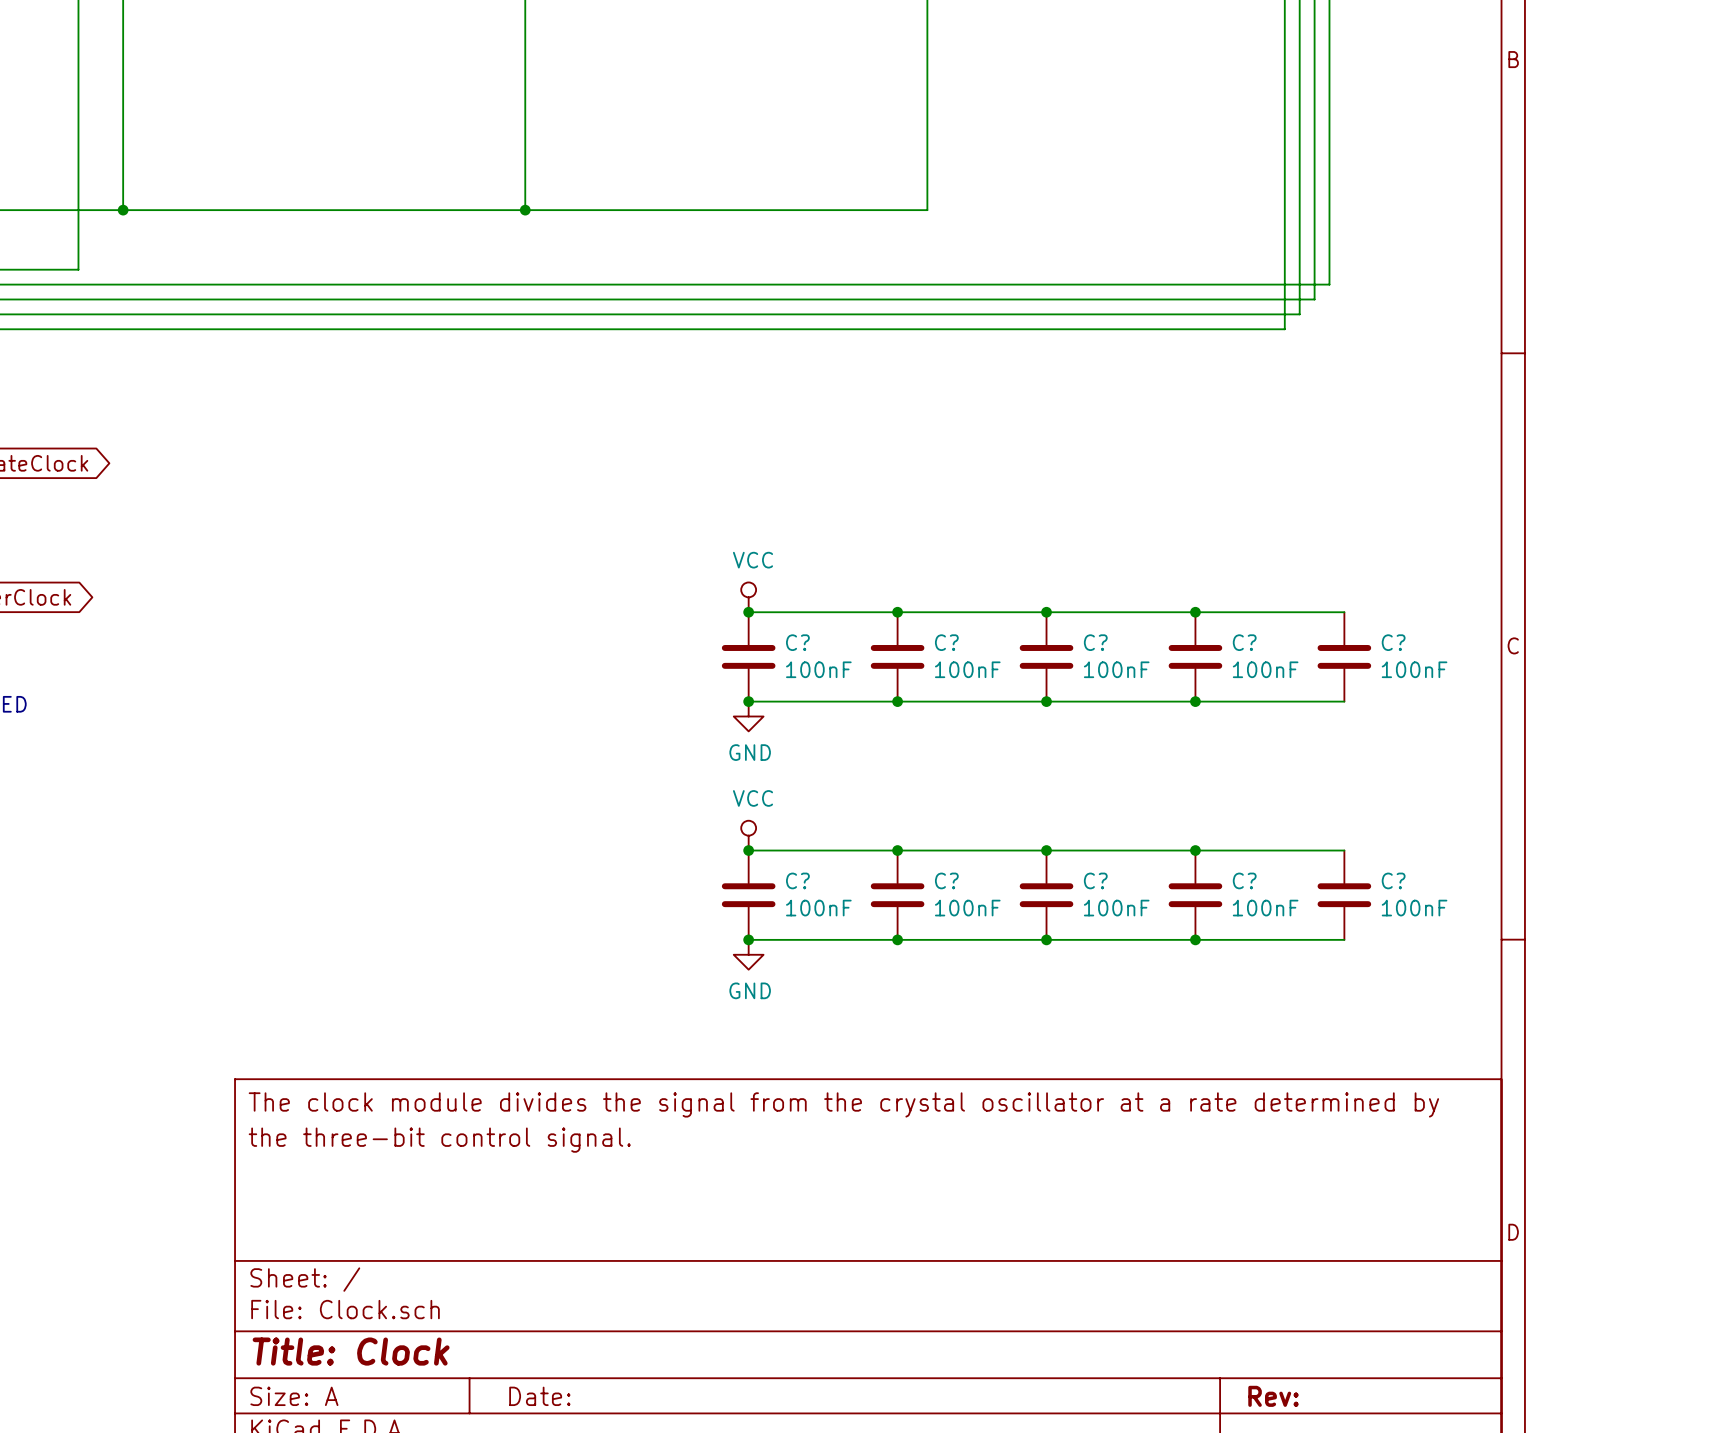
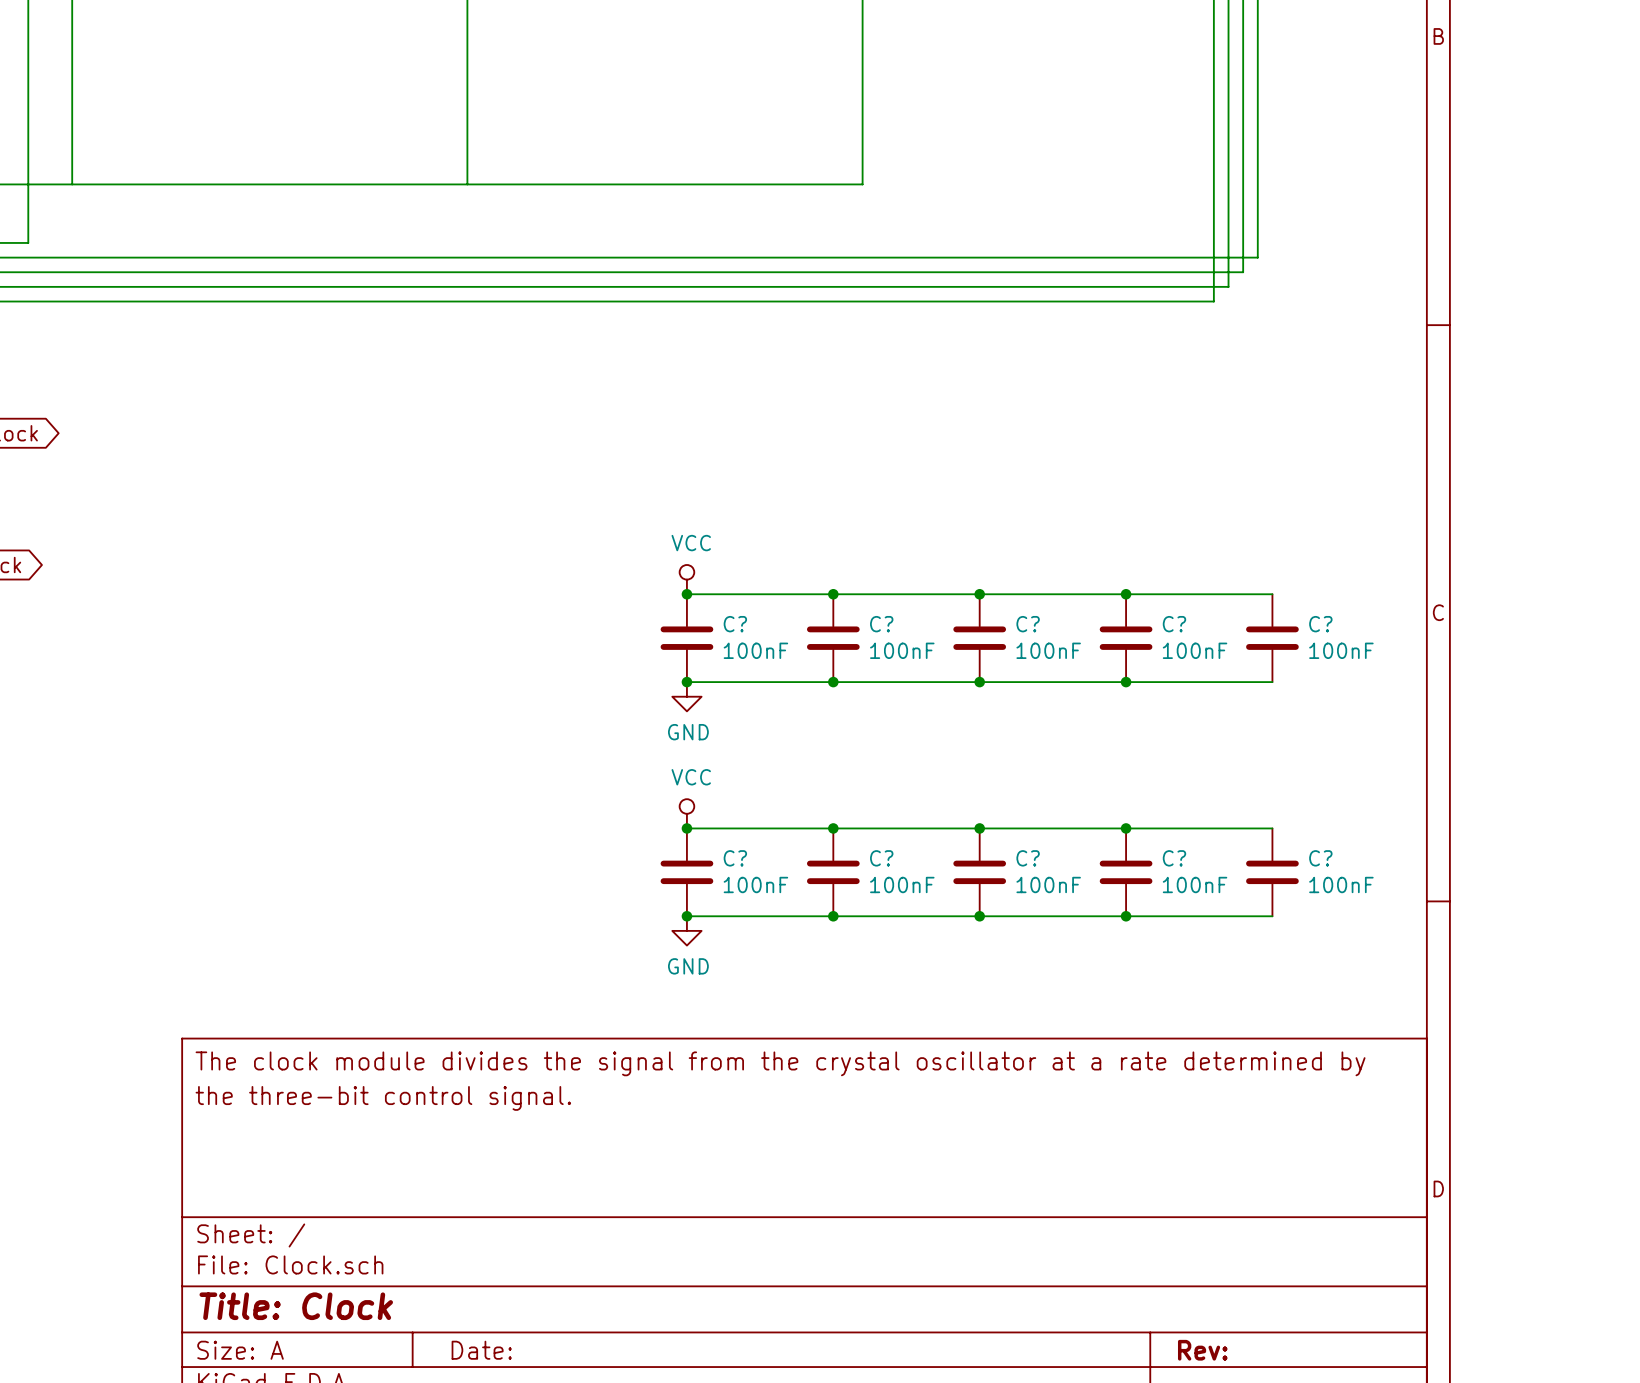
junction: (123, 210) -> none
junction: (525, 210) -> none
power symbol position: VCC (748, 597) -> VCC (686, 579)
wire: (748, 612) (1344, 612) -> (686, 594) (1272, 594)
junction position: (748, 612) -> (686, 594)
junction position: (897, 612) -> (833, 594)
junction position: (1046, 612) -> (979, 594)
junction position: (1195, 612) -> (1126, 594)
C? position: (748, 656) -> (686, 638)
C? position: (897, 656) -> (833, 638)
C? position: (1046, 656) -> (979, 638)
C? position: (1195, 656) -> (1126, 638)
C? position: (1344, 656) -> (1272, 638)
wire: (748, 701) (1344, 701) -> (686, 682) (1272, 682)
junction position: (748, 701) -> (686, 682)
junction position: (897, 701) -> (833, 682)
junction position: (1046, 701) -> (979, 682)
junction position: (1195, 701) -> (1126, 682)
power symbol position: GND (748, 716) -> GND (686, 696)
power symbol position: VCC (748, 835) -> VCC (686, 813)
wire: (748, 850) (1344, 850) -> (686, 828) (1272, 828)
junction position: (748, 850) -> (686, 828)
junction position: (897, 850) -> (833, 828)
junction position: (1046, 850) -> (979, 828)
junction position: (1195, 850) -> (1126, 828)
C? position: (748, 895) -> (686, 872)
C? position: (897, 895) -> (833, 872)
C? position: (1046, 895) -> (979, 872)
C? position: (1195, 895) -> (1126, 872)
C? position: (1344, 895) -> (1272, 872)
wire: (748, 939) (1344, 939) -> (686, 916) (1272, 916)
junction position: (748, 939) -> (686, 916)
junction position: (897, 939) -> (833, 916)
junction position: (1046, 939) -> (979, 916)
junction position: (1195, 939) -> (1126, 916)
power symbol position: GND (748, 954) -> GND (686, 930)

